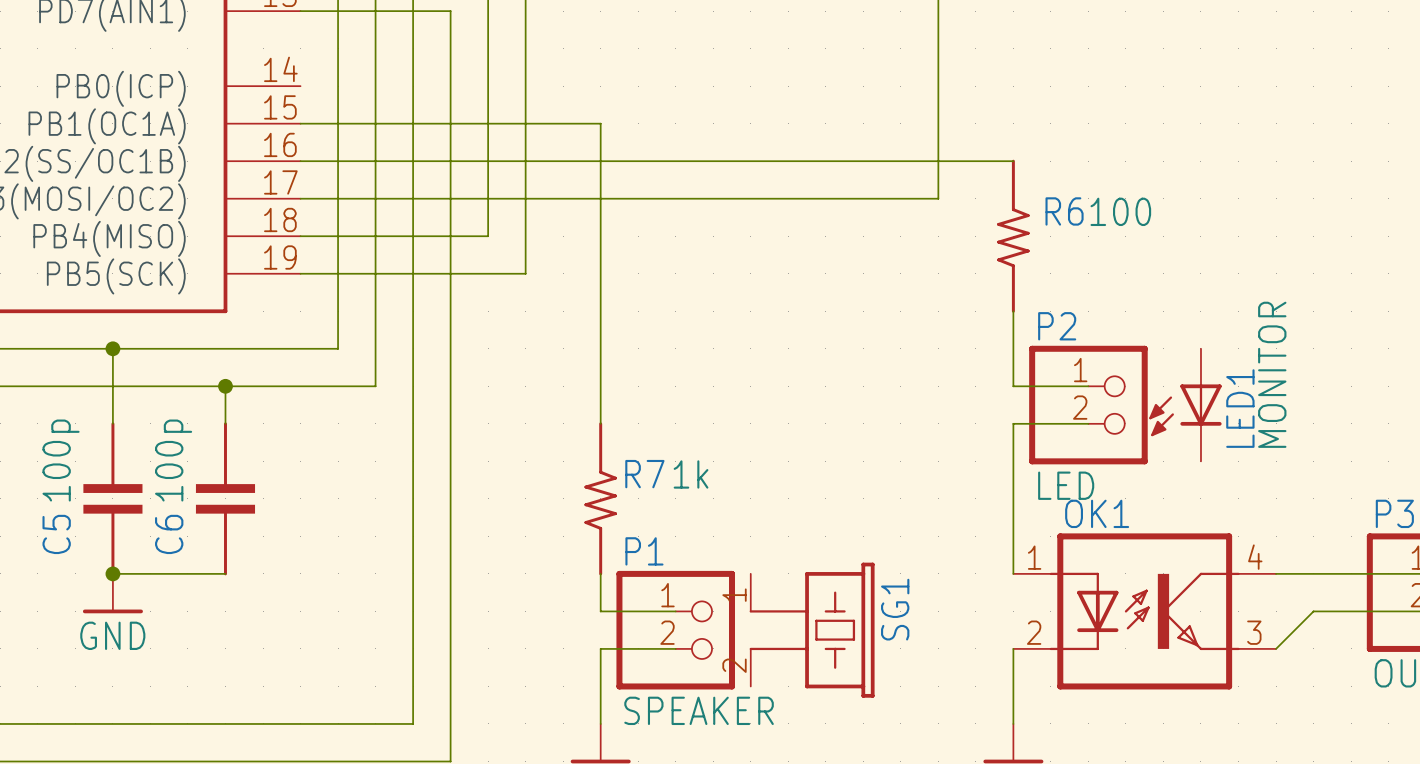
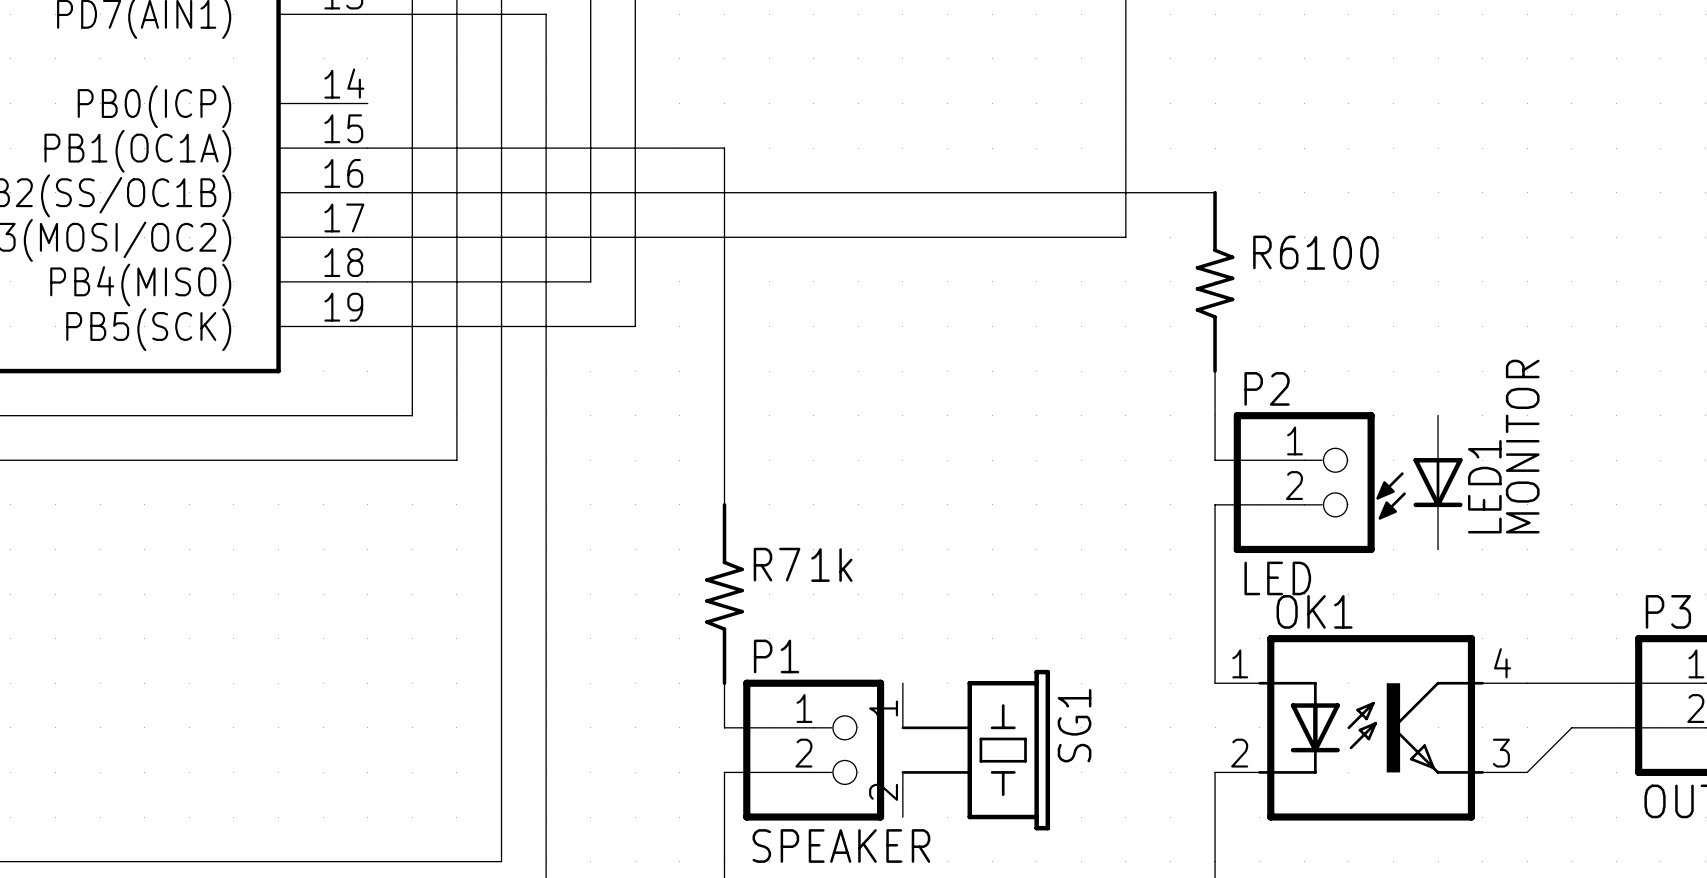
wire: (112, 348) (112, 423) -> none
junction: (112, 348) -> none
wire: (225, 386) (225, 423) -> none
junction: (225, 386) -> none
C5: 100p (112, 498) -> none
C6: 100p (225, 498) -> none
wire: (112, 573) (225, 573) -> none
junction: (112, 573) -> none
power symbol: GND (112, 593) -> none

